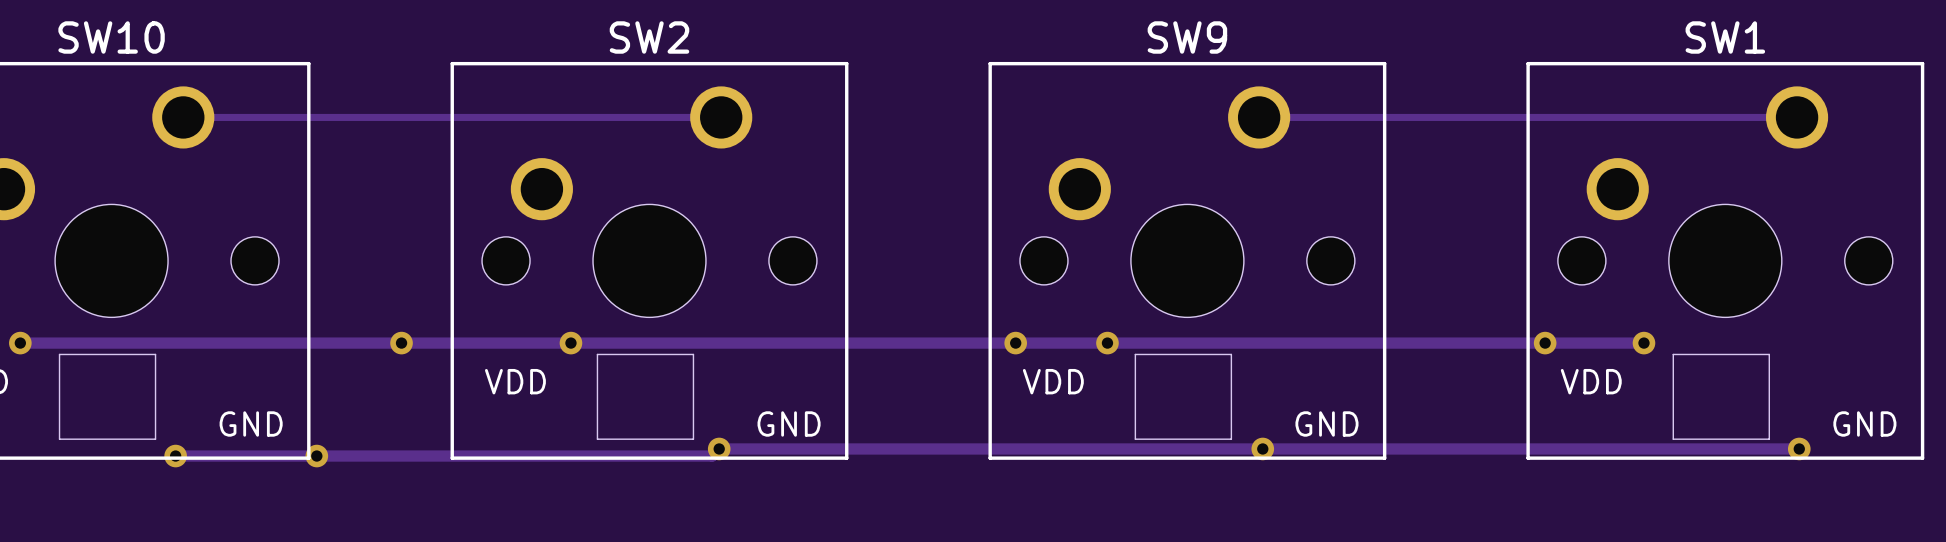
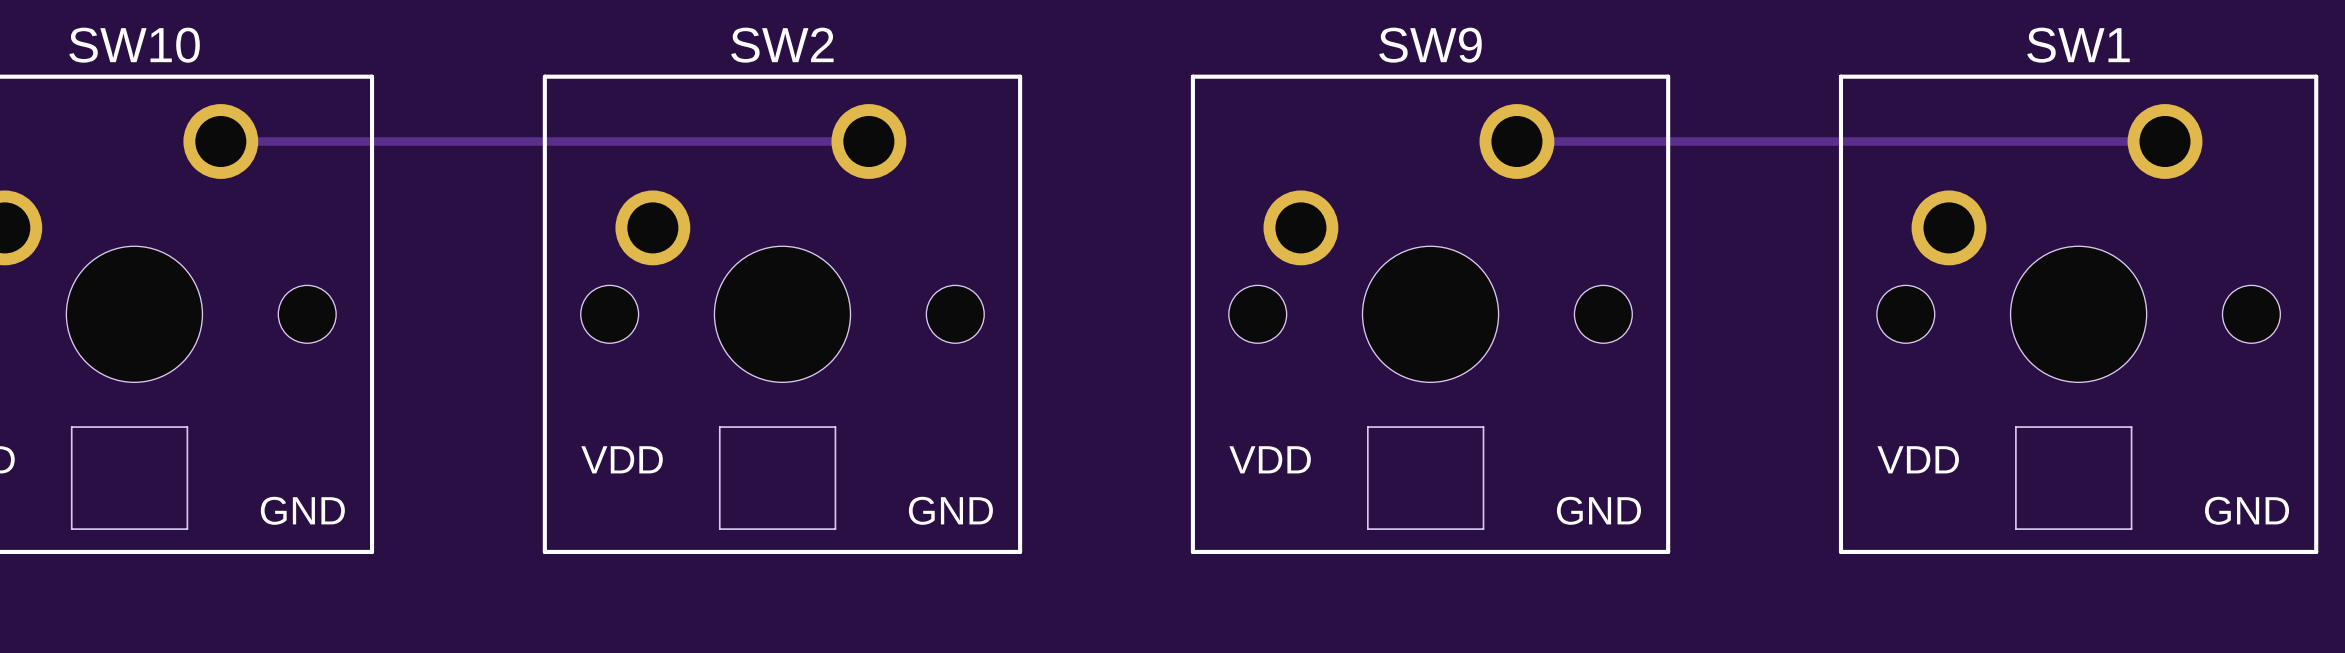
track: (20, 343) (1643, 343) -> none
via: (20, 343) -> none
via: (401, 343) -> none
via: (570, 343) -> none
via: (1015, 343) -> none
via: (1107, 343) -> none
via: (1545, 343) -> none
via: (1643, 343) -> none
via: (719, 448) -> none
via: (1262, 448) -> none
track: (1799, 448) (719, 448) (712, 456) (175, 456) -> none
via: (1799, 448) -> none
via: (175, 456) -> none
via: (316, 456) -> none

